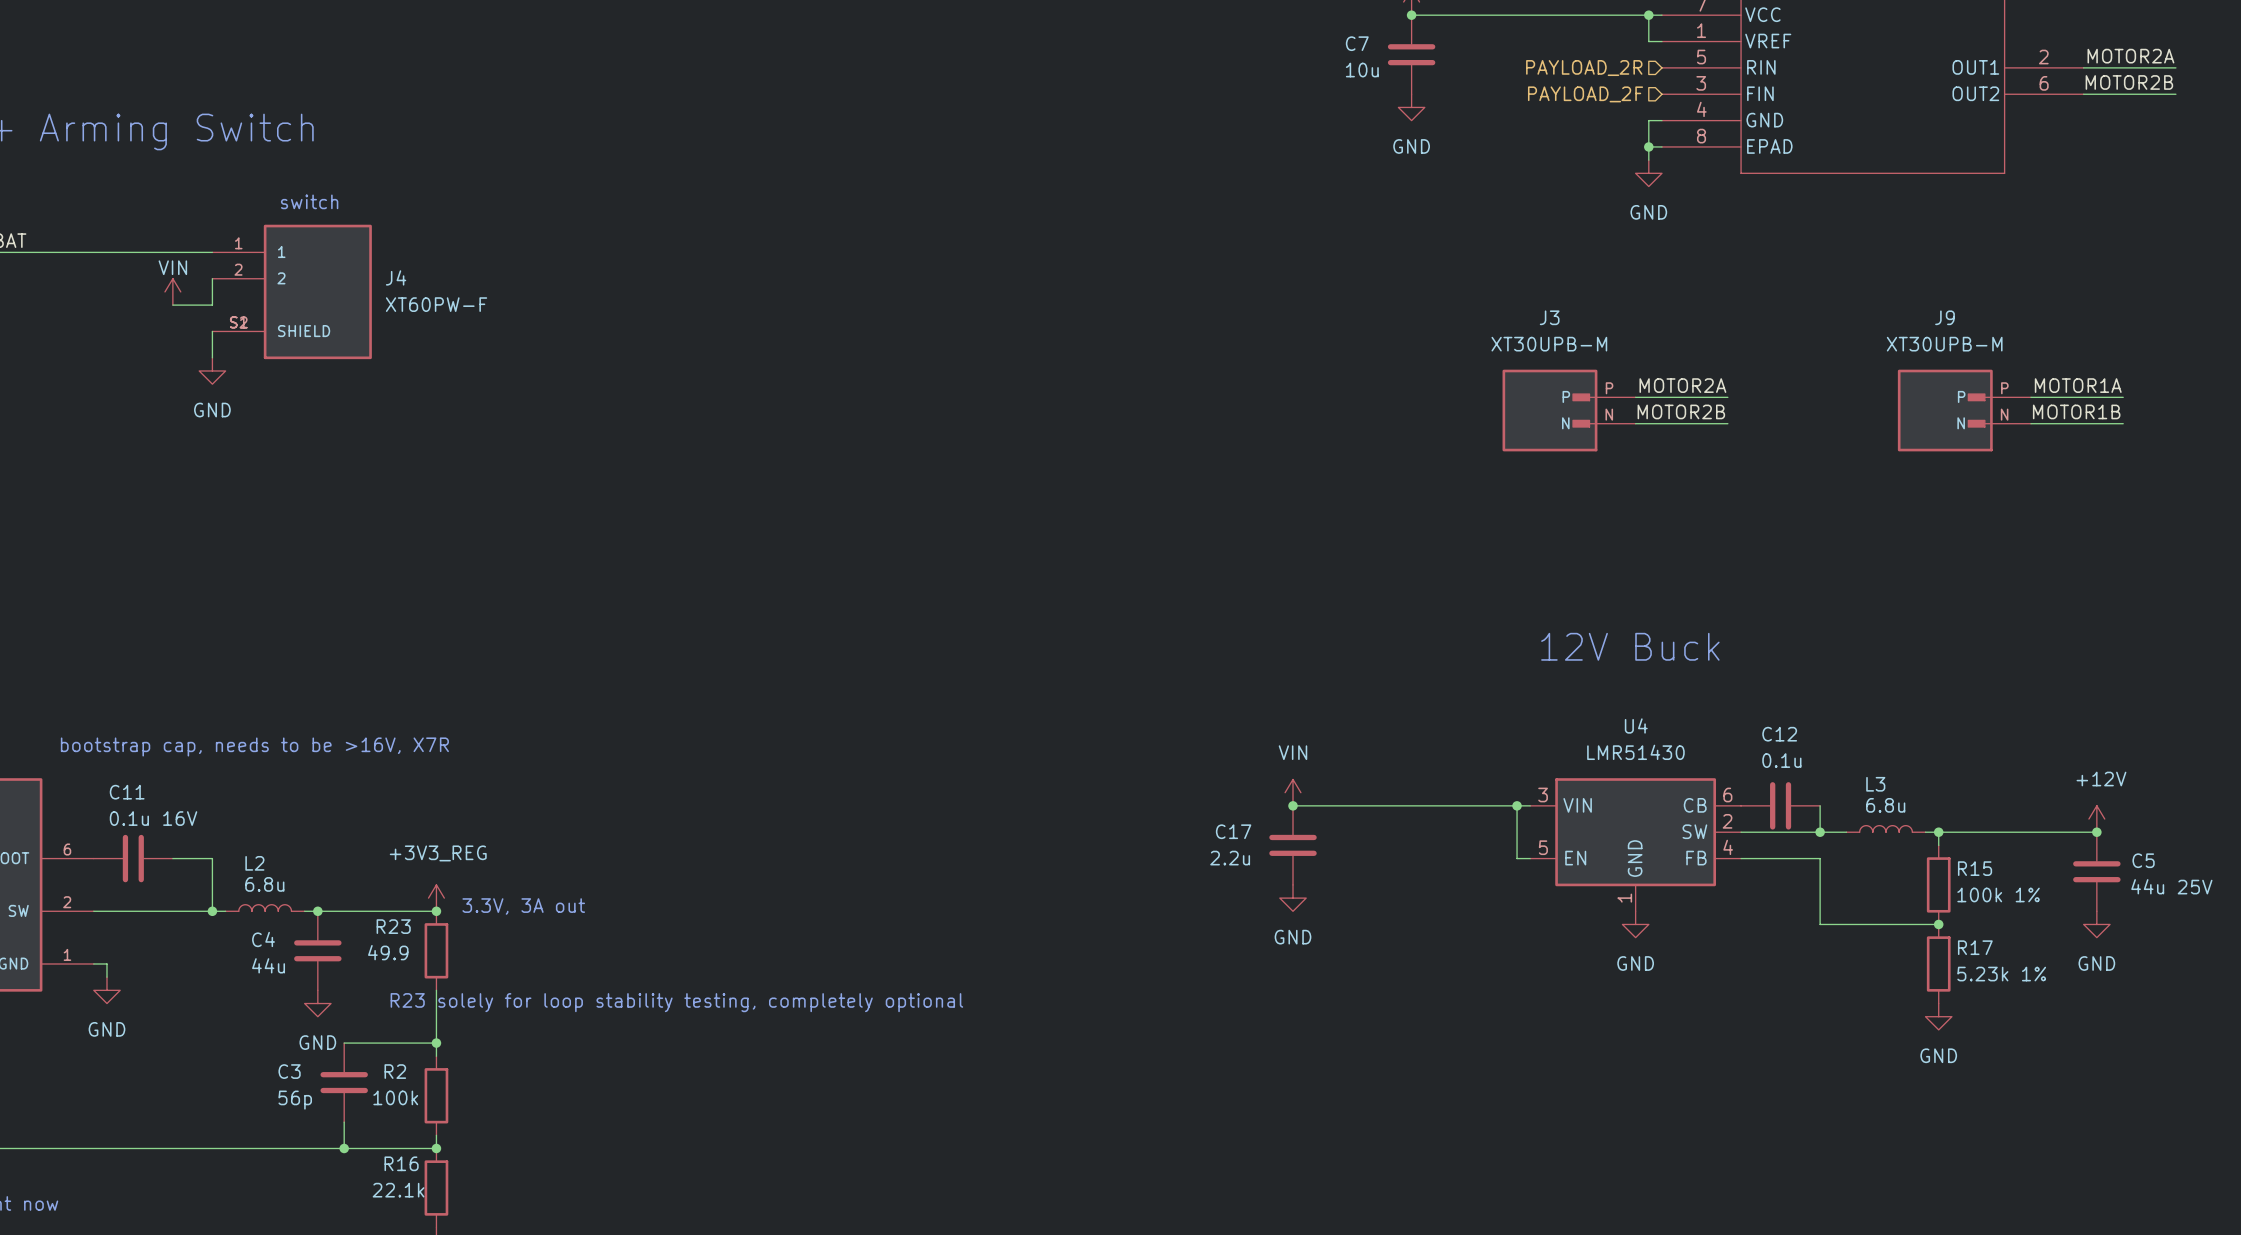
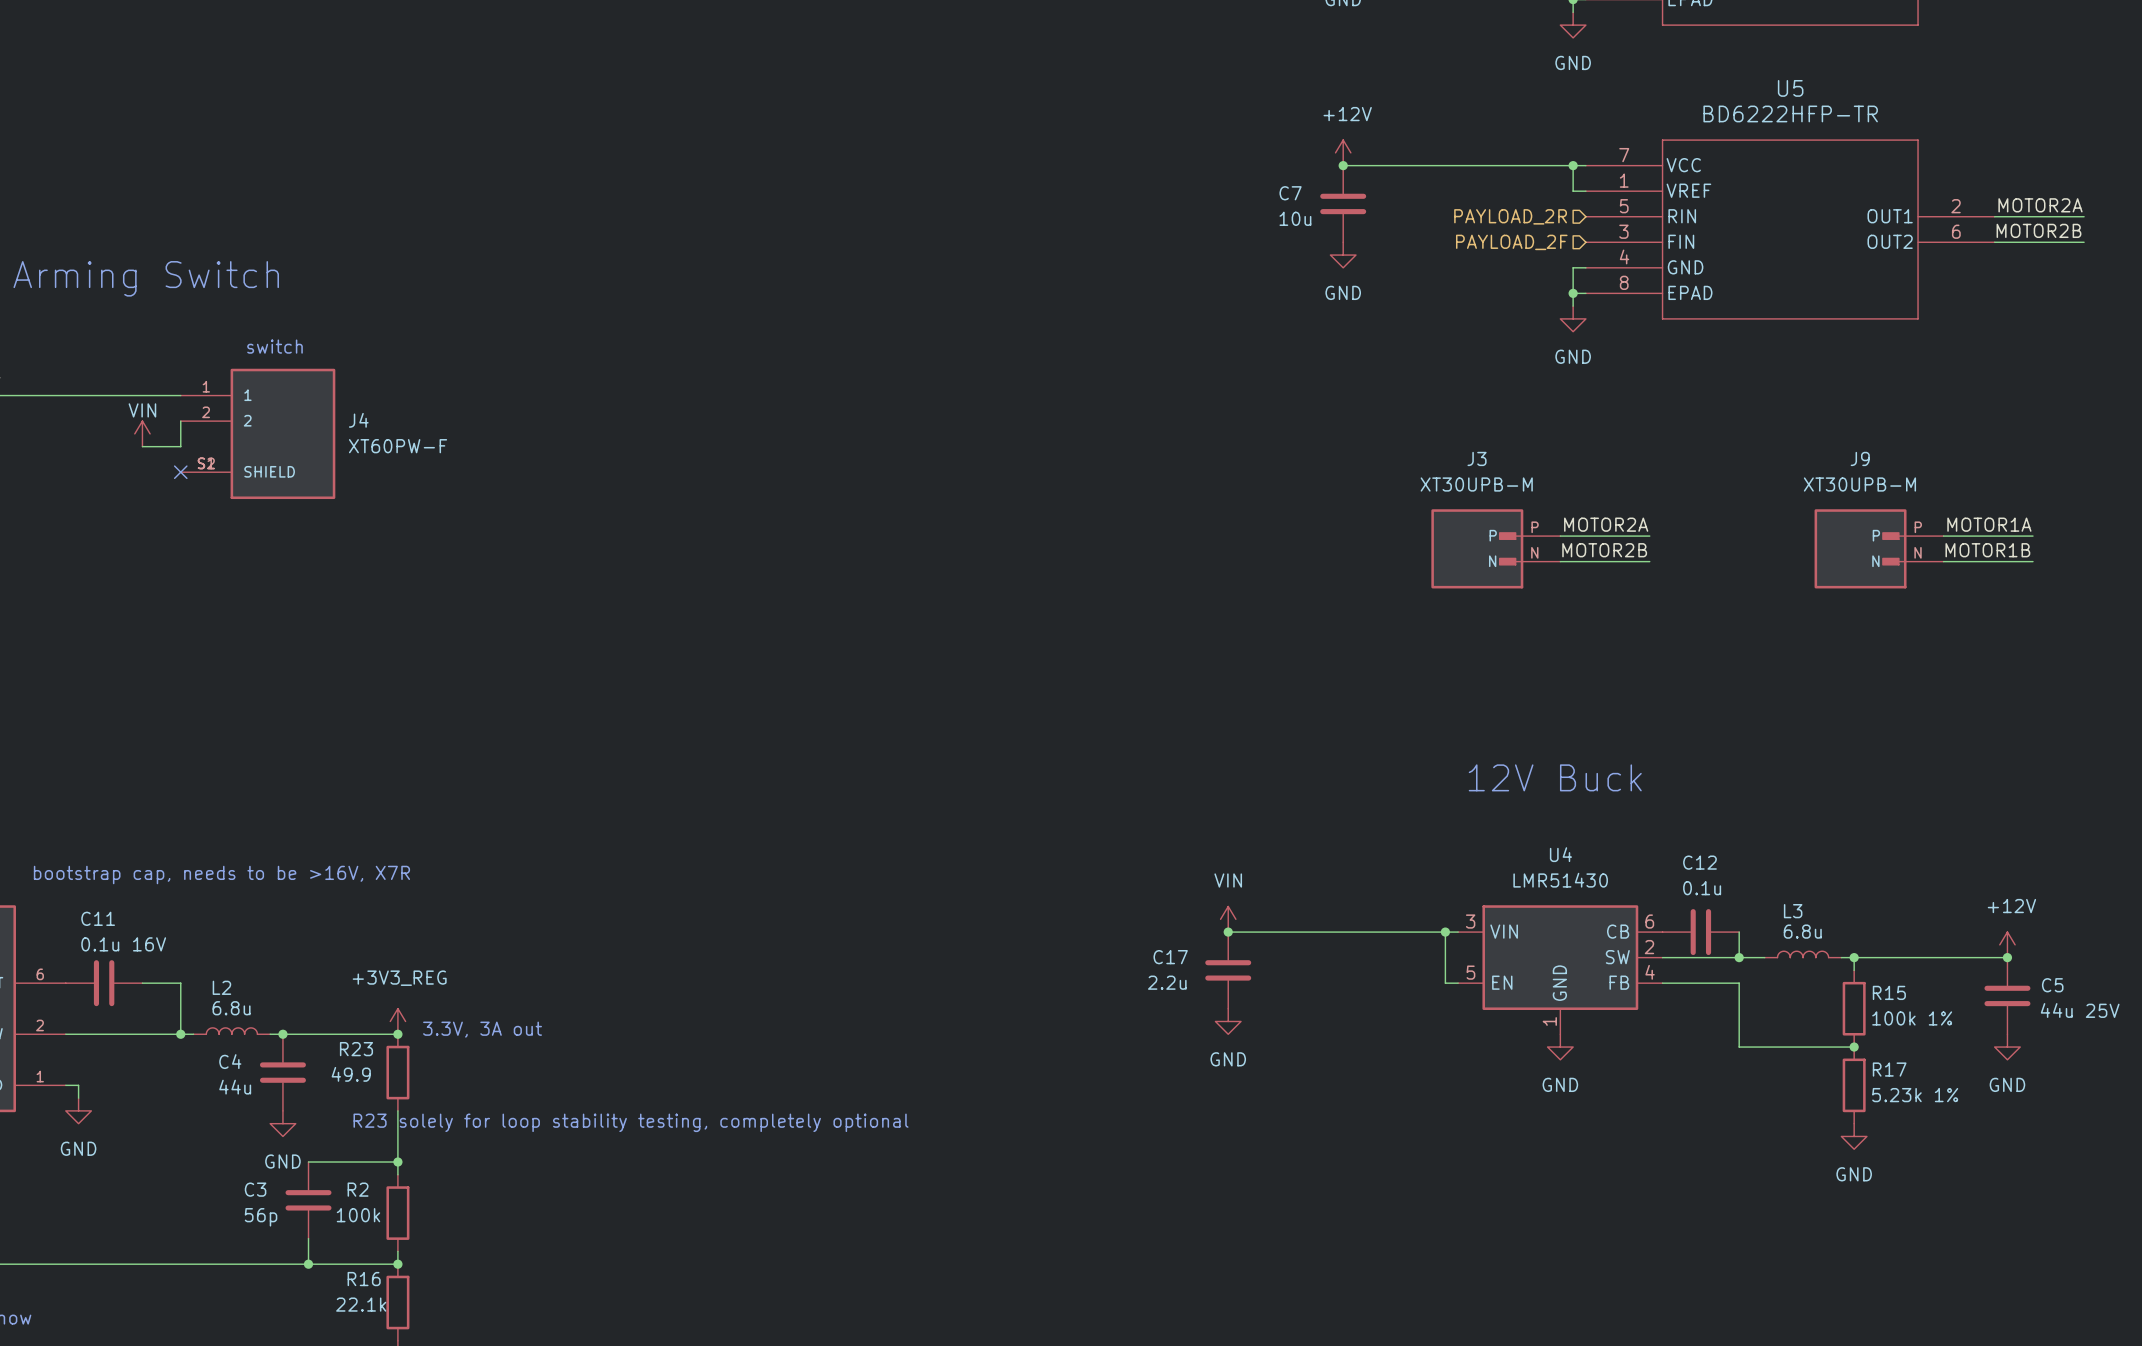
wire: (212, 331) (212, 357) -> none
no-connect mark: none -> (180, 472)
power symbol: GND (212, 370) -> none

